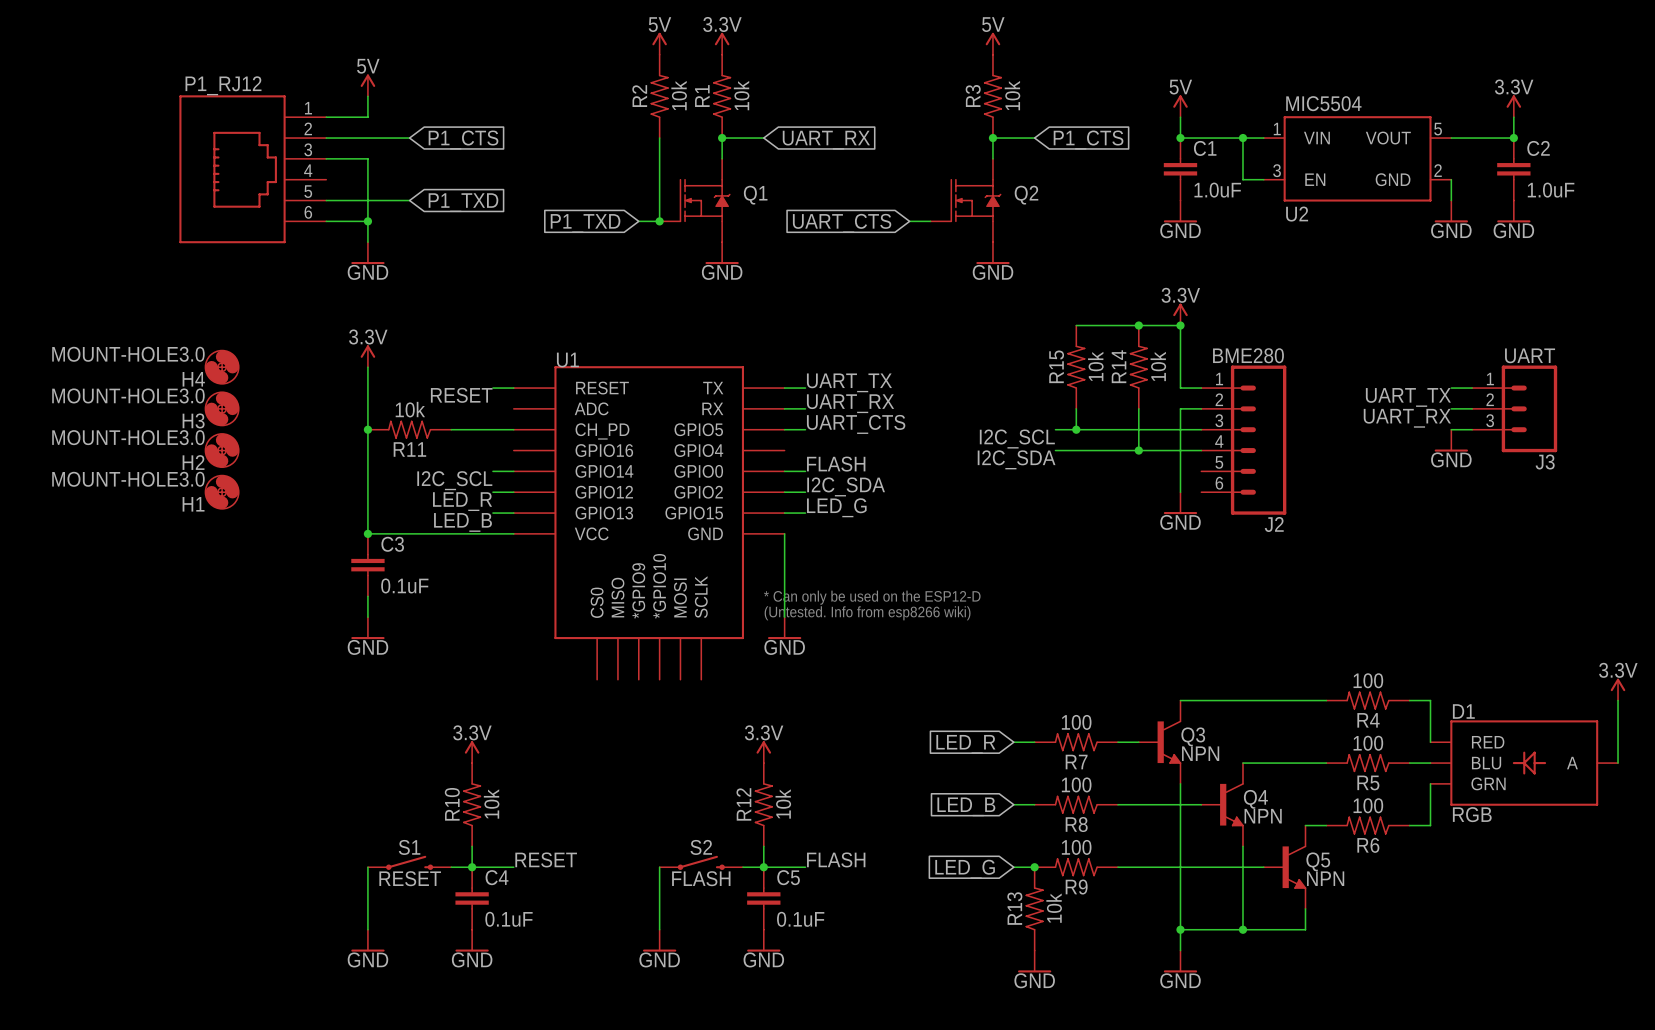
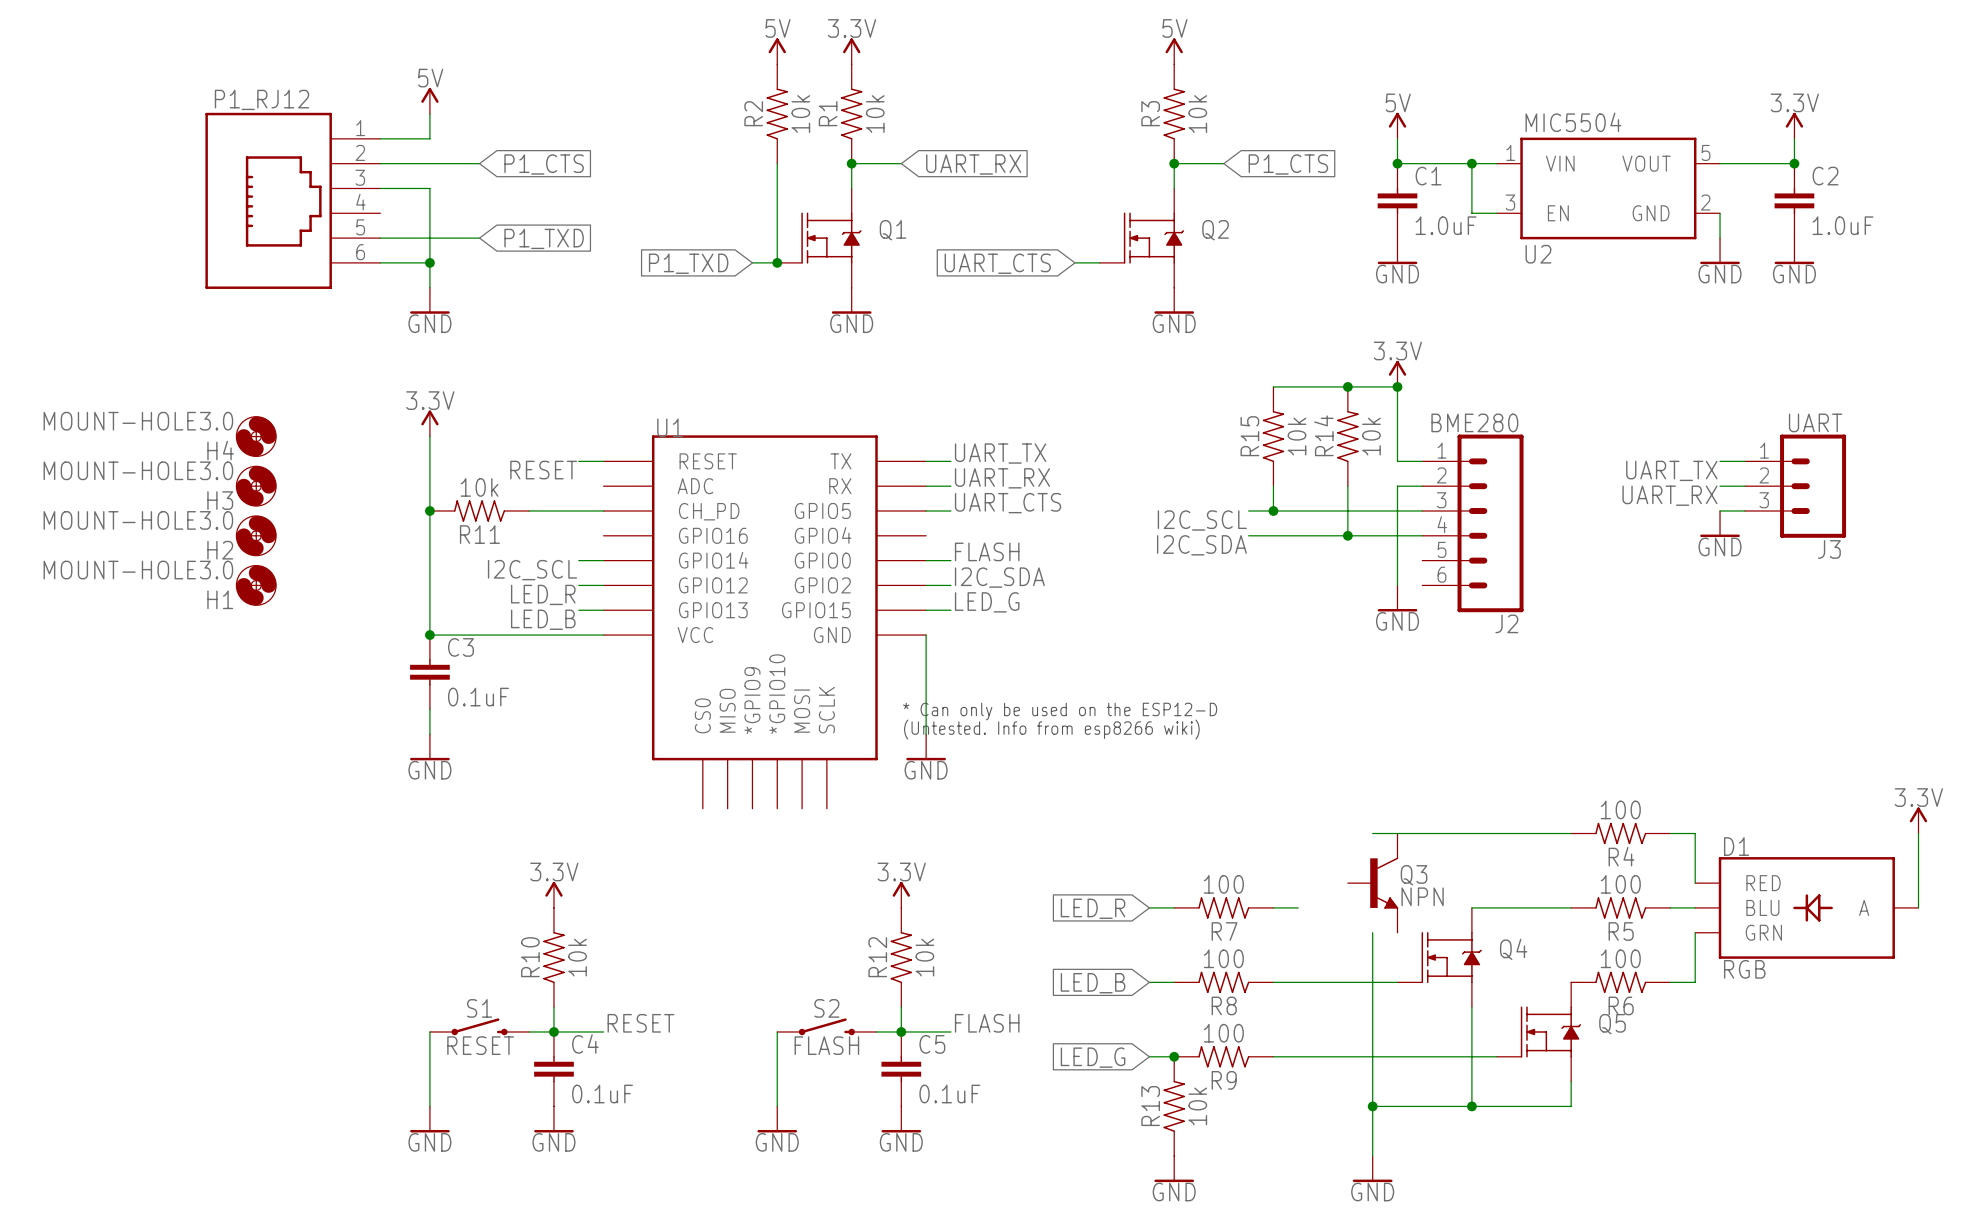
wire: none -> (1372, 833) (1397, 833)
wire: (1013, 742) (1034, 742) -> (1149, 907) (1174, 907)
R7 position: (1076, 742) -> (1223, 907)
wire: (1117, 742) (1138, 742) -> (1273, 907) (1298, 907)
global label position: LED_R (965, 744) -> LED_R (1093, 908)
Q4 symbol: [1201, 763, 1244, 847] -> [1397, 907, 1482, 1008]
wire: none -> (1372, 932) (1372, 1156)
wire: (1180, 783) (1180, 950) -> none
Q4 name position: Q4 (1255, 799) -> Q4 (1513, 949)
wire: (1013, 804) (1034, 804) -> (1149, 982) (1174, 982)
R8 position: (1076, 804) -> (1223, 982)
wire: (1117, 804) (1201, 804) -> none
global label position: LED_B (966, 806) -> LED_B (1093, 983)
Q4 value: NPN (1263, 816) -> none
wire: none -> (1273, 982) (1397, 982)
Q5 symbol: [1263, 825, 1307, 909] -> [1496, 982, 1582, 1082]
wire: (1305, 825) (1326, 825) -> (1372, 1106) (1397, 1106)
Q5 name position: Q5 (1318, 861) -> Q5 (1612, 1024)
wire: (1013, 867) (1034, 867) -> (1149, 1056) (1174, 1056)
junction position: (1034, 867) -> (1174, 1056)
R9 position: (1076, 867) -> (1223, 1056)
wire: (1117, 867) (1263, 867) -> none
global label position: LED_G (965, 869) -> LED_G (1093, 1057)
Q5 value: NPN (1325, 878) -> none
wire: none -> (1273, 1056) (1496, 1056)
R13 position: (1034, 908) -> (1174, 1106)
wire: (1305, 908) (1305, 929) -> (1571, 1081) (1571, 1106) (1546, 1106)
junction position: (1180, 929) -> (1372, 1106)
power symbol position: GND (1034, 961) -> GND (1174, 1169)
power symbol position: GND (1180, 961) -> GND (1372, 1169)

